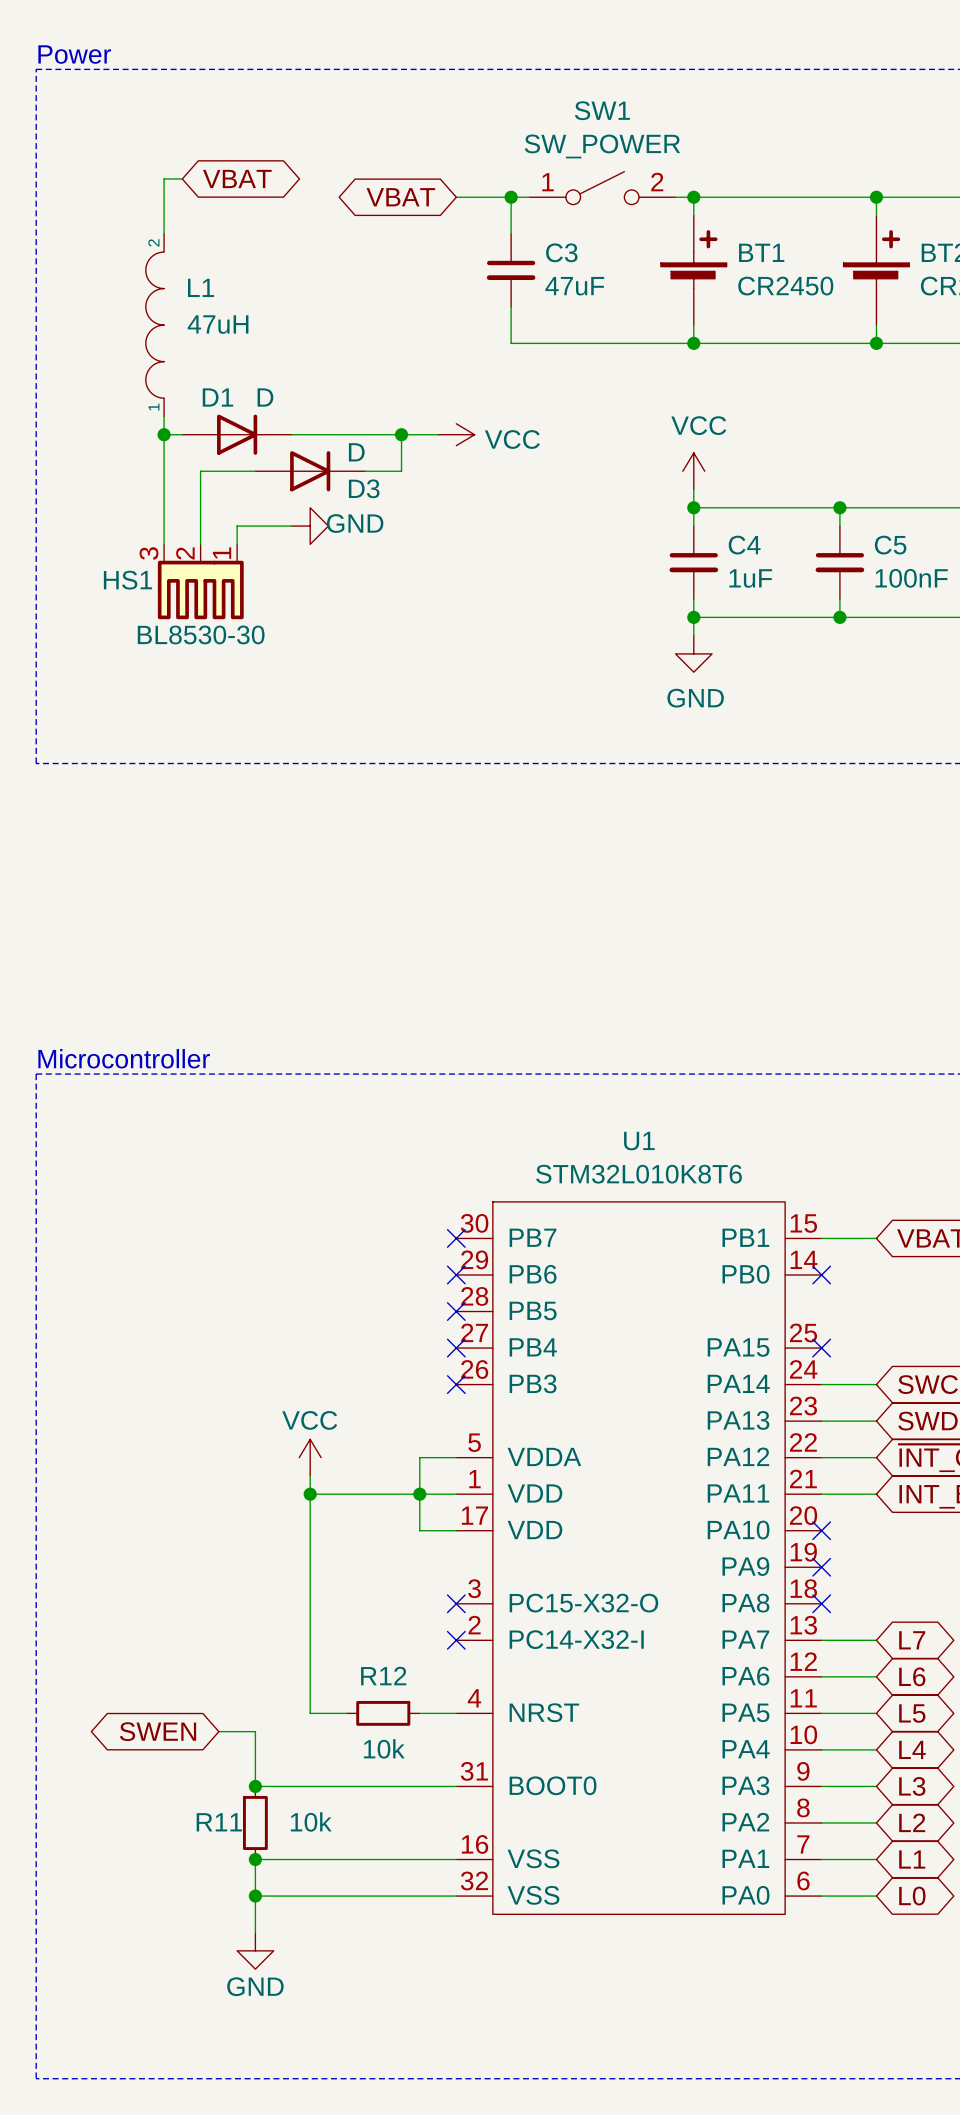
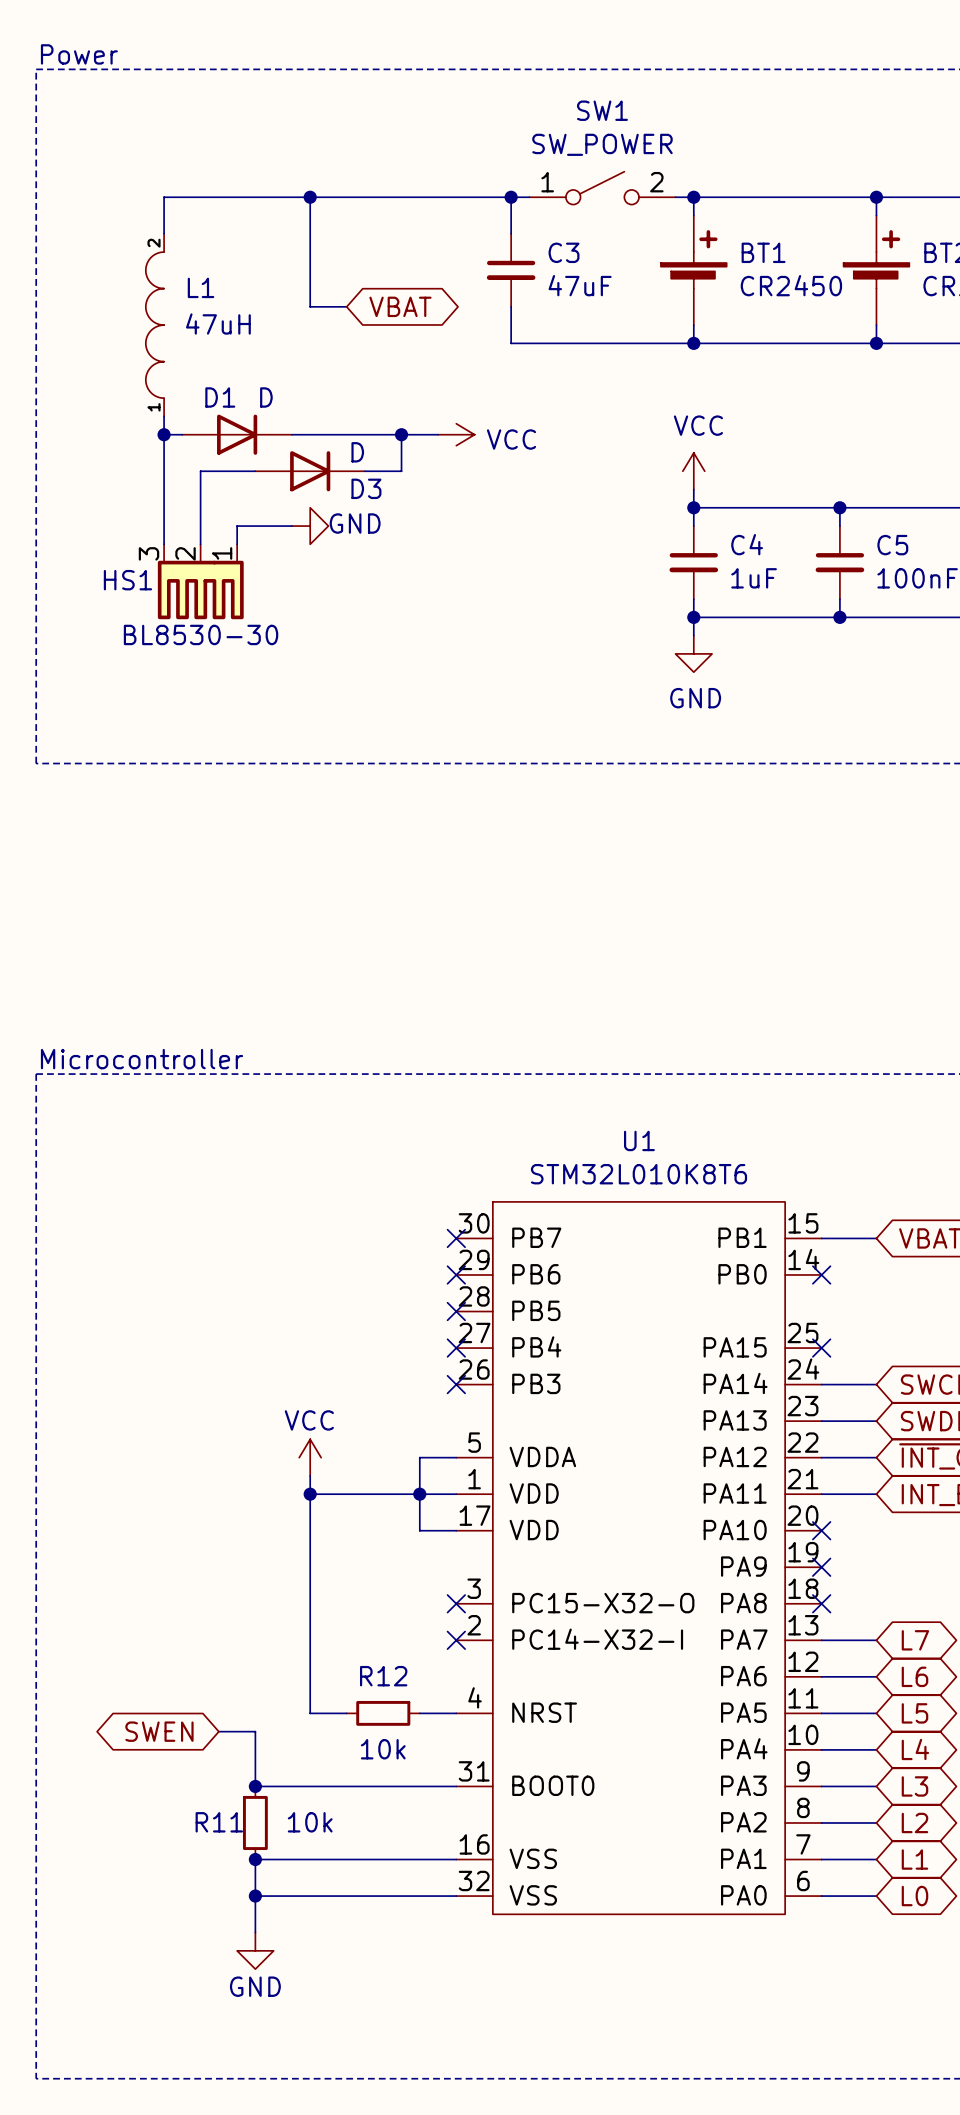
wire: (182, 178) (164, 178) (164, 197) -> (456, 197) (164, 197)
global label: VBAT (237, 178) -> none
wire: none -> (310, 197) (310, 306) (346, 306)
junction: none -> (310, 197)
global label: VBAT (400, 197) -> none
global label: none -> VBAT (400, 306)

